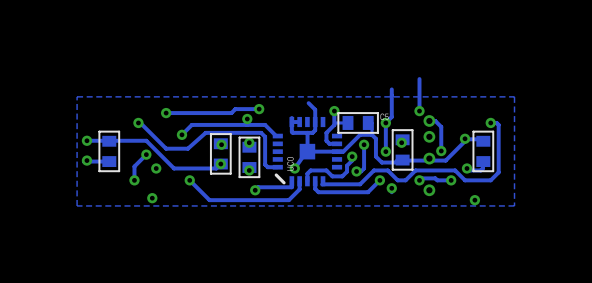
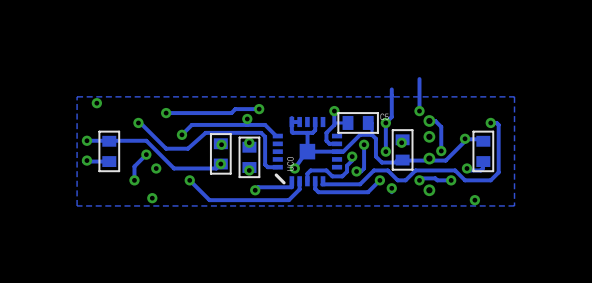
via: none -> (96, 103)
track: (308, 103) (315, 109) (315, 122) -> none

